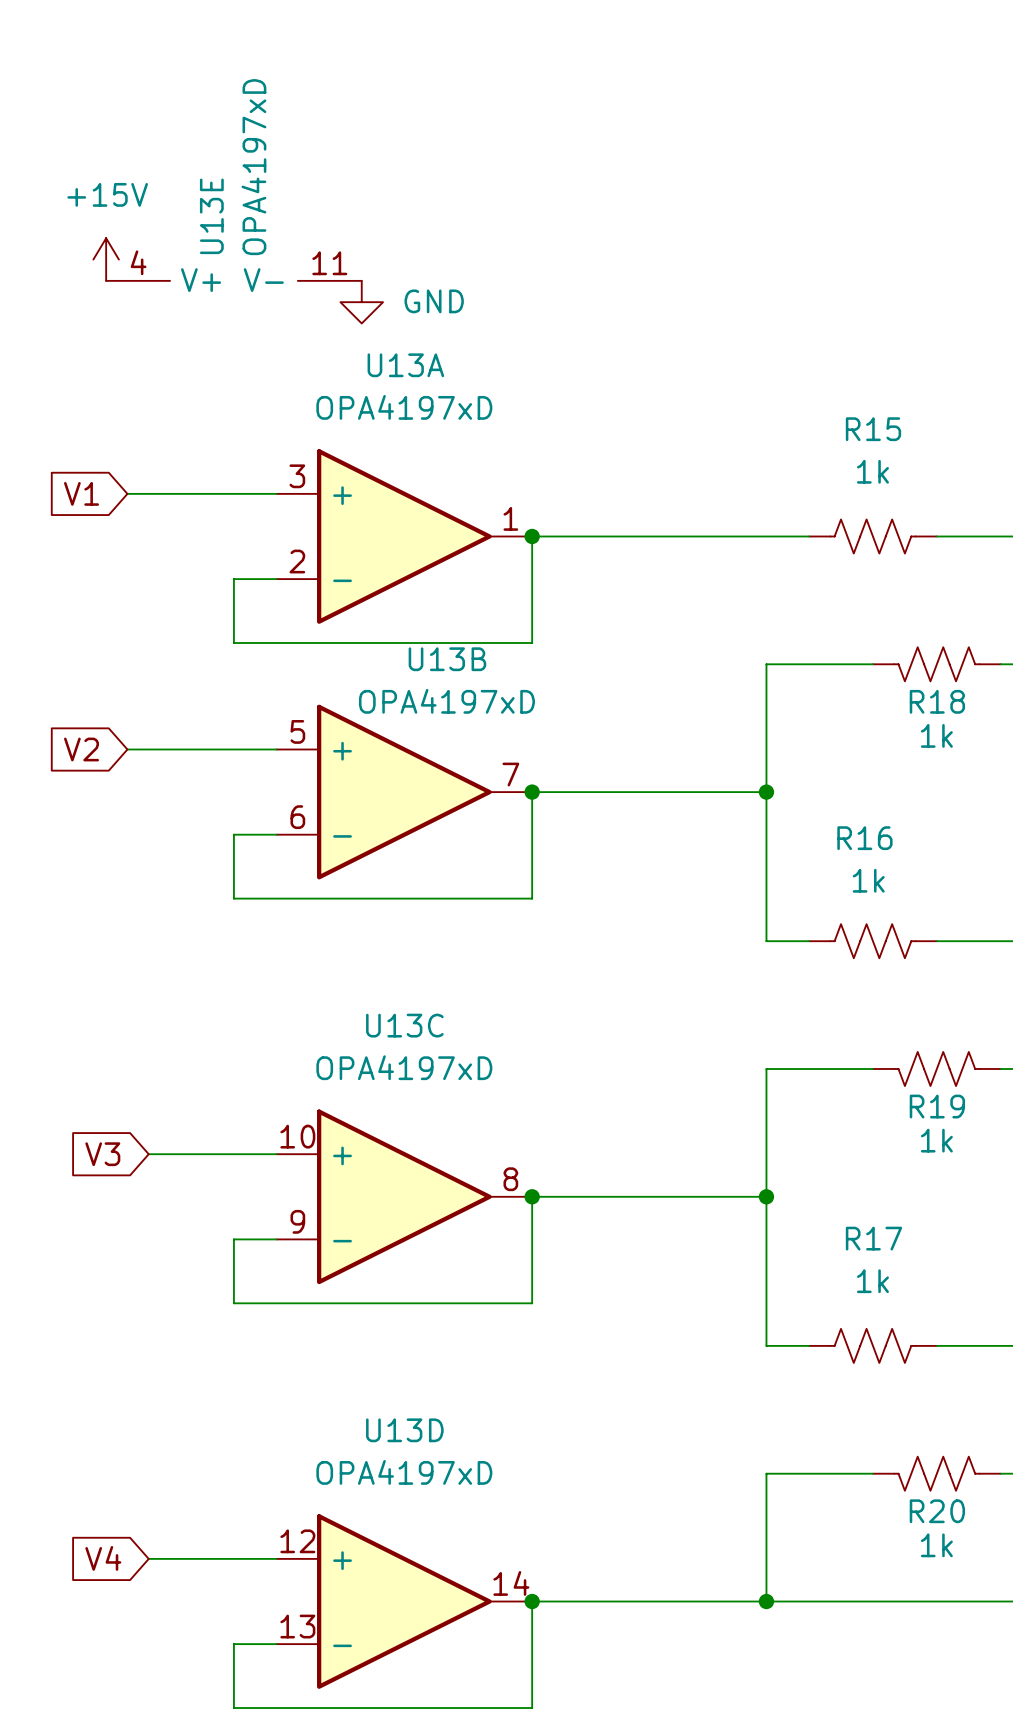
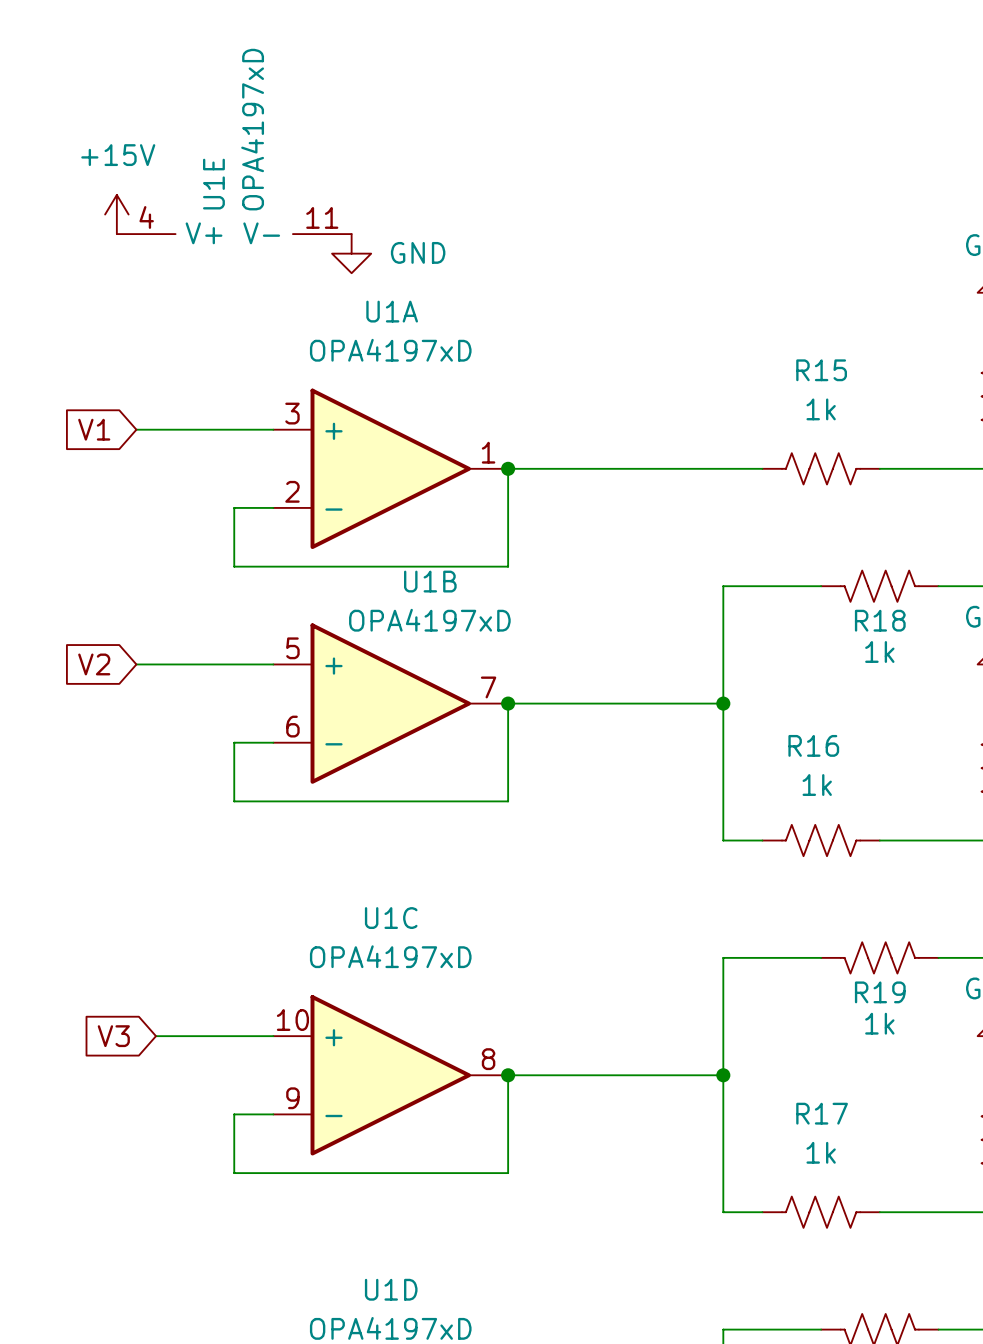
U13E name: U13E (211, 216) -> U1E (213, 184)
U13A name: U13A (405, 365) -> U1A (392, 311)
U13B name: U13B (447, 659) -> U1B (430, 581)
U13C name: U13C (404, 1025) -> U1C (391, 918)
U13D name: U13D (404, 1430) -> U1D (391, 1289)

